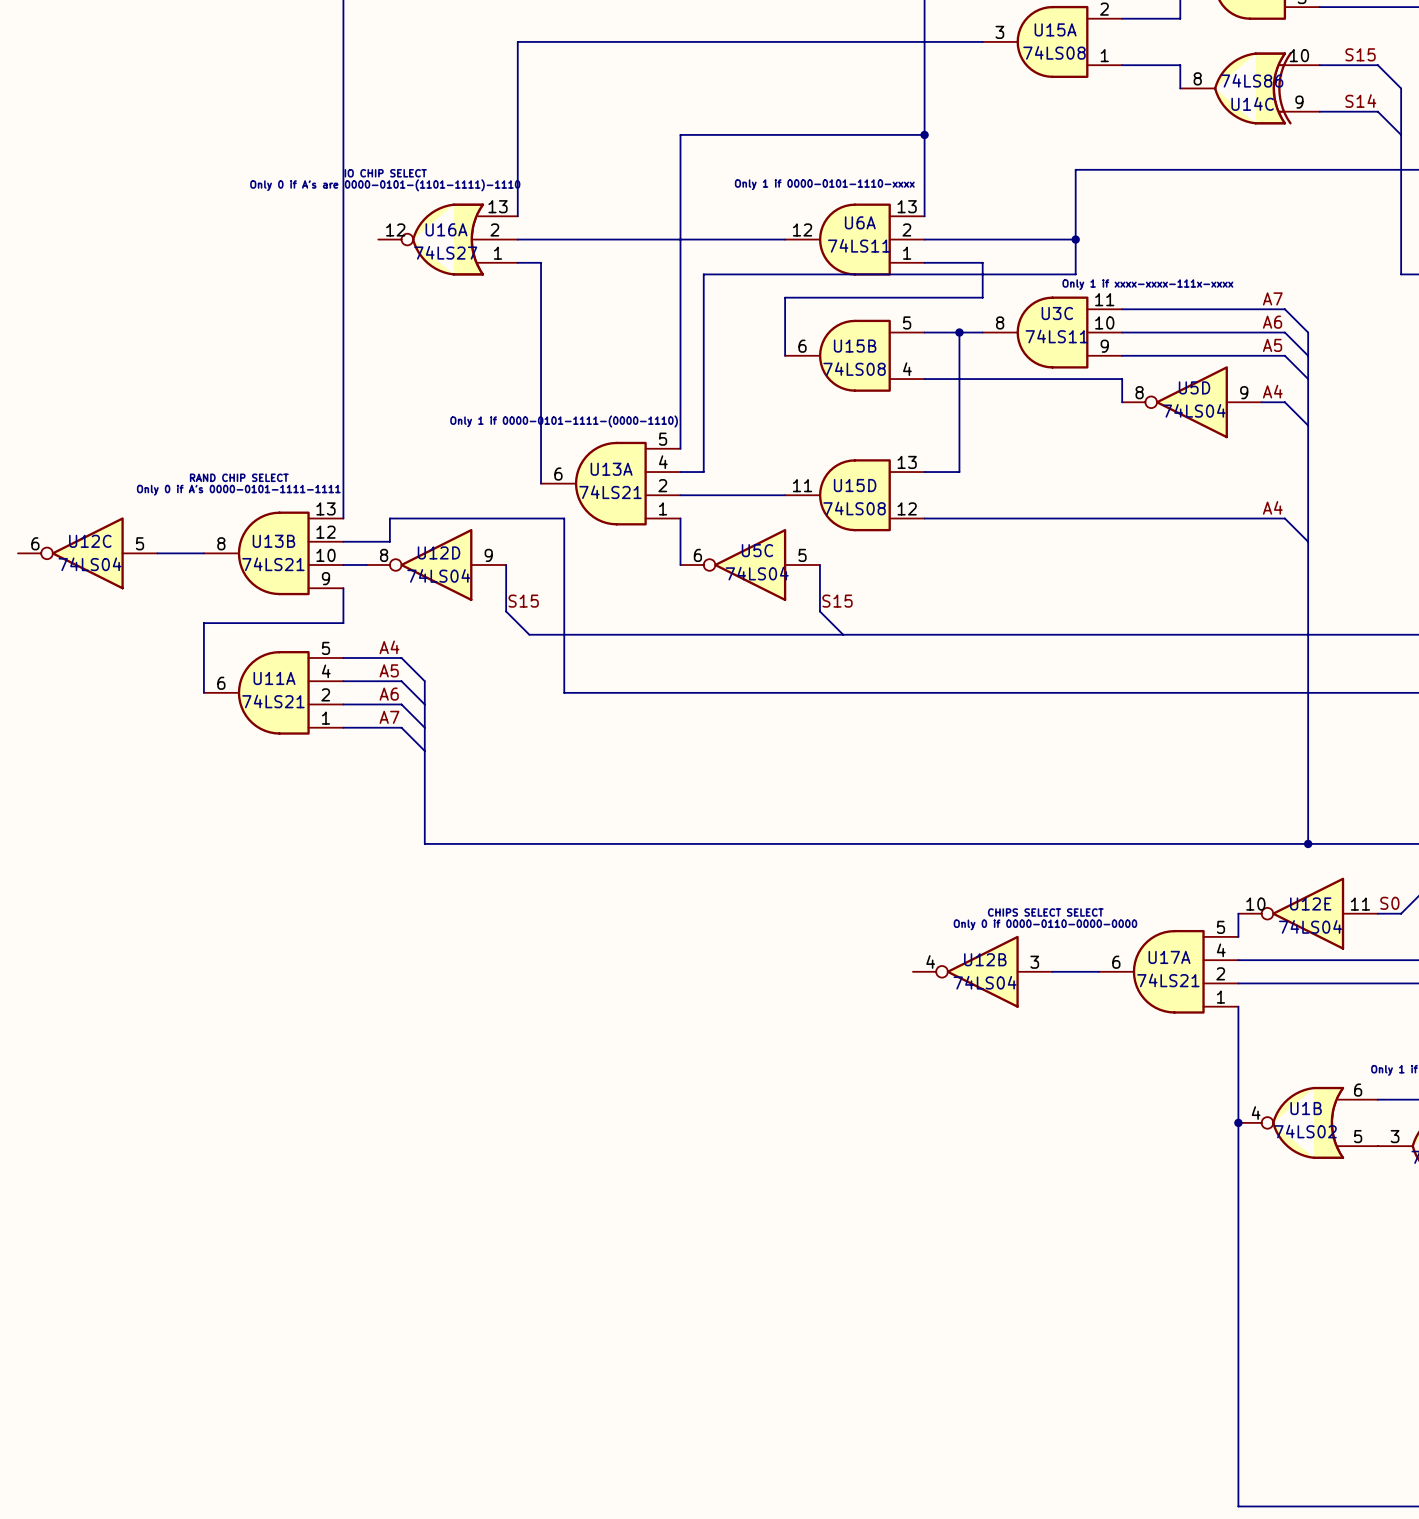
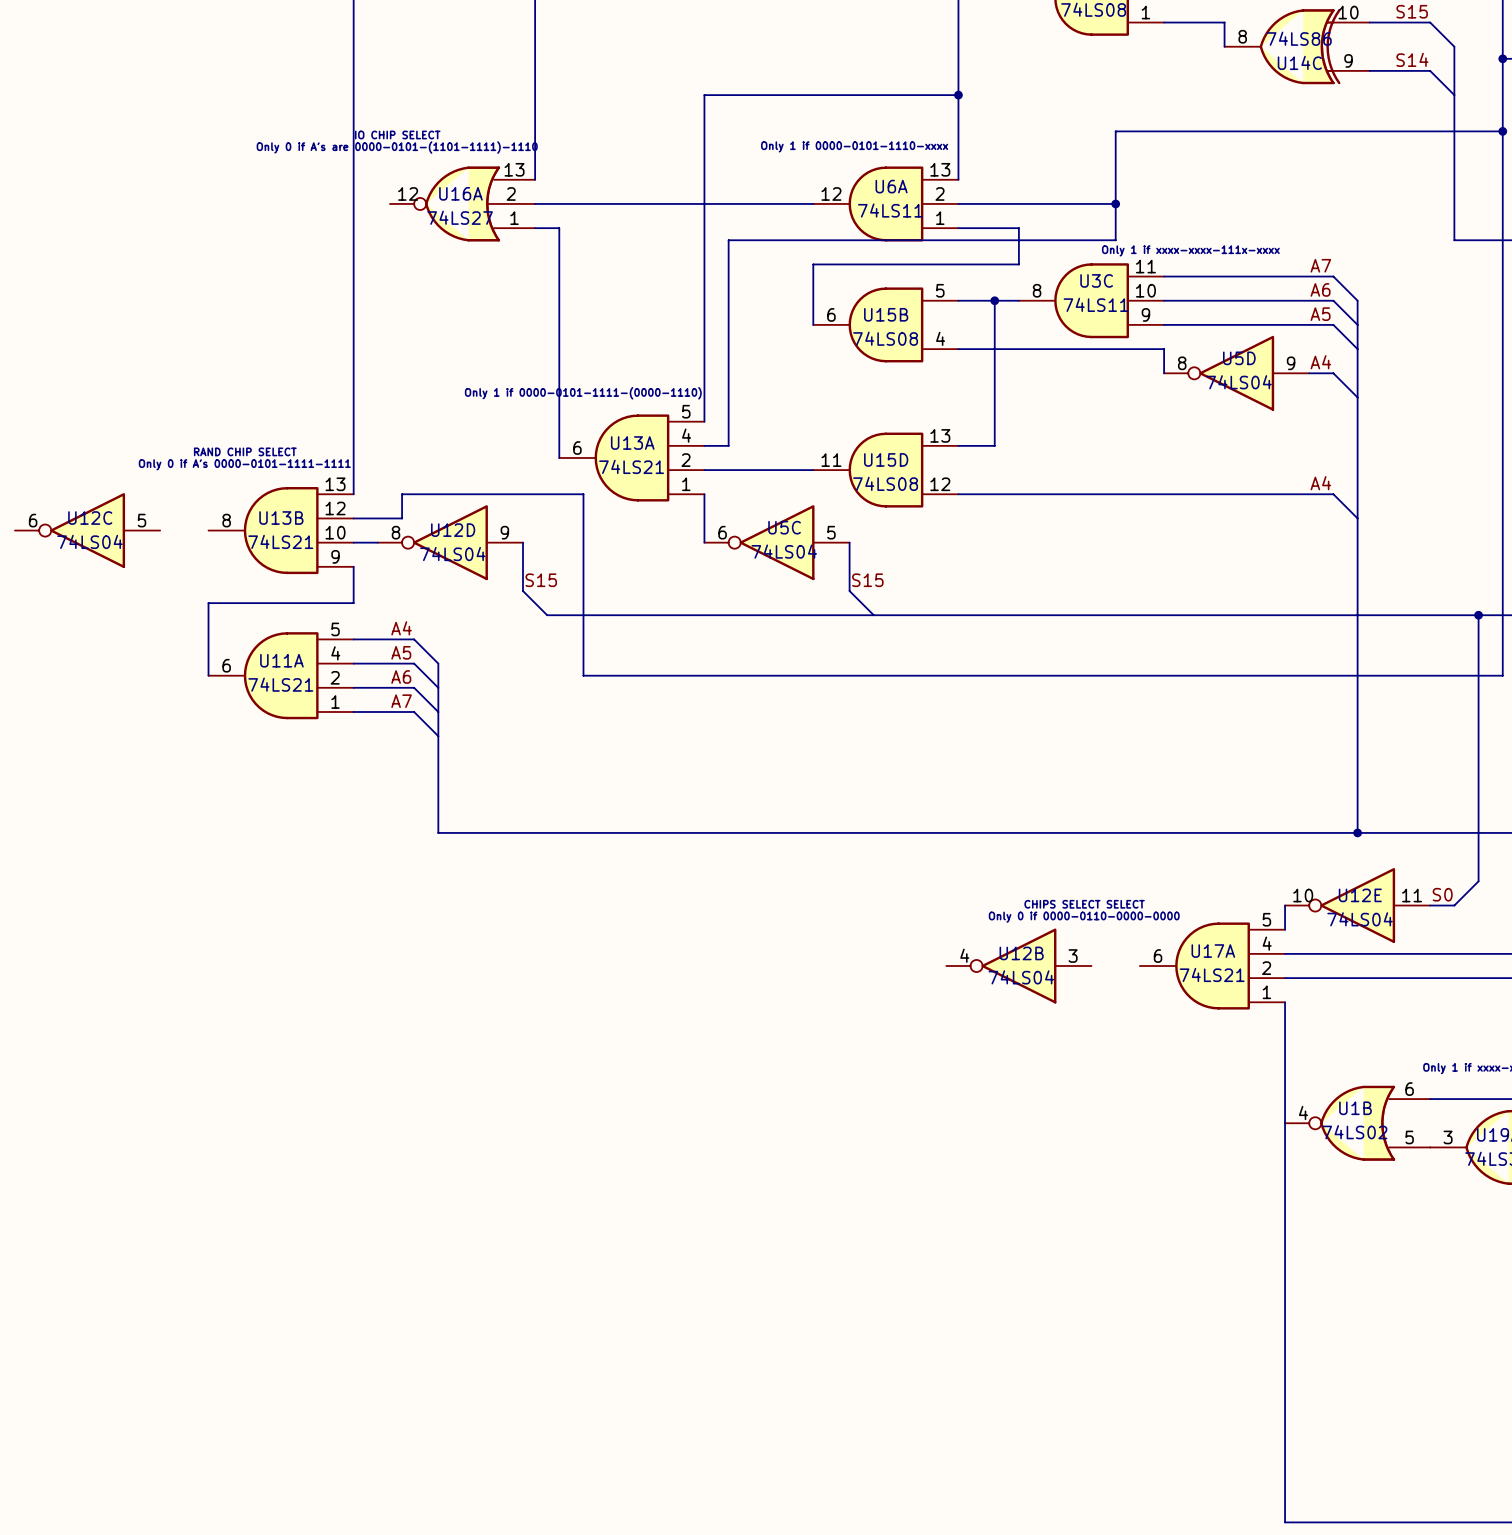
wire: (157, 553) (203, 553) -> none
wire: (1052, 971) (1098, 971) -> none
junction: (1238, 1122) -> none

